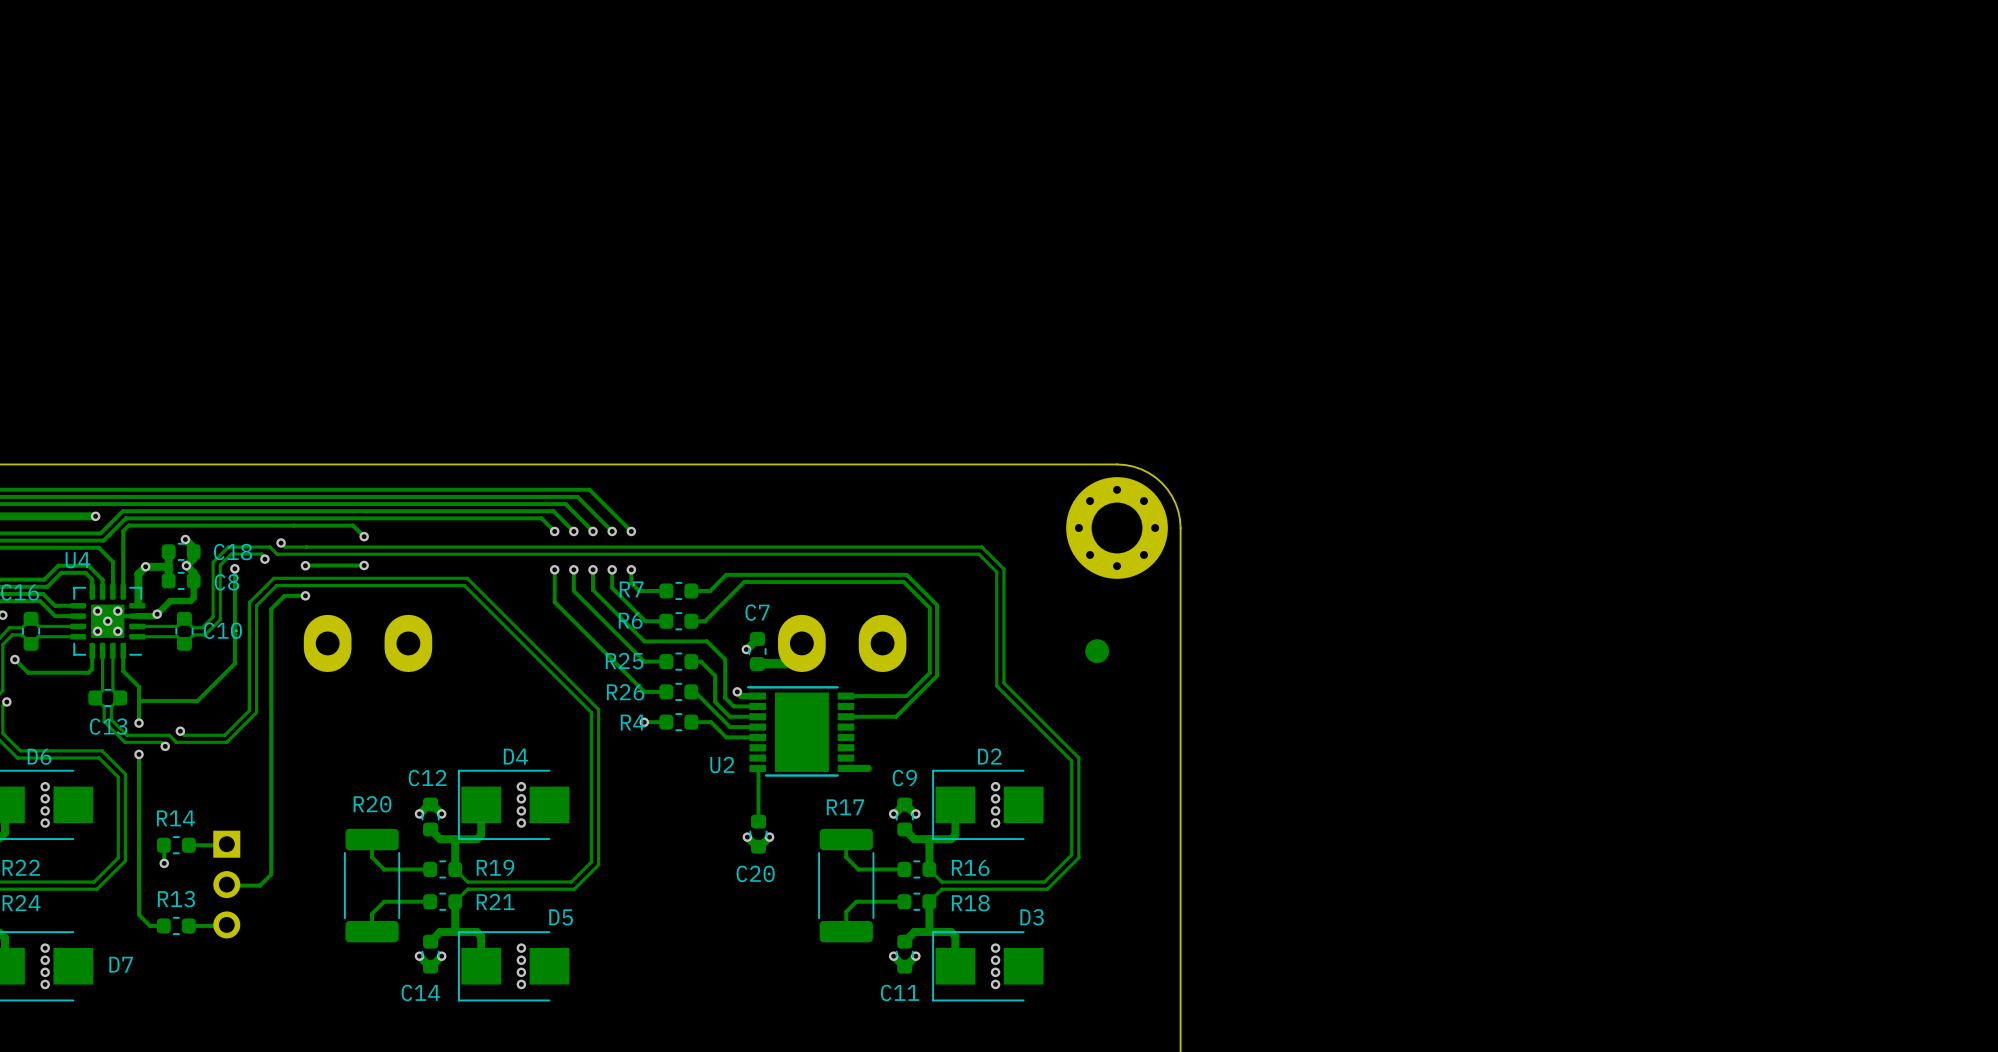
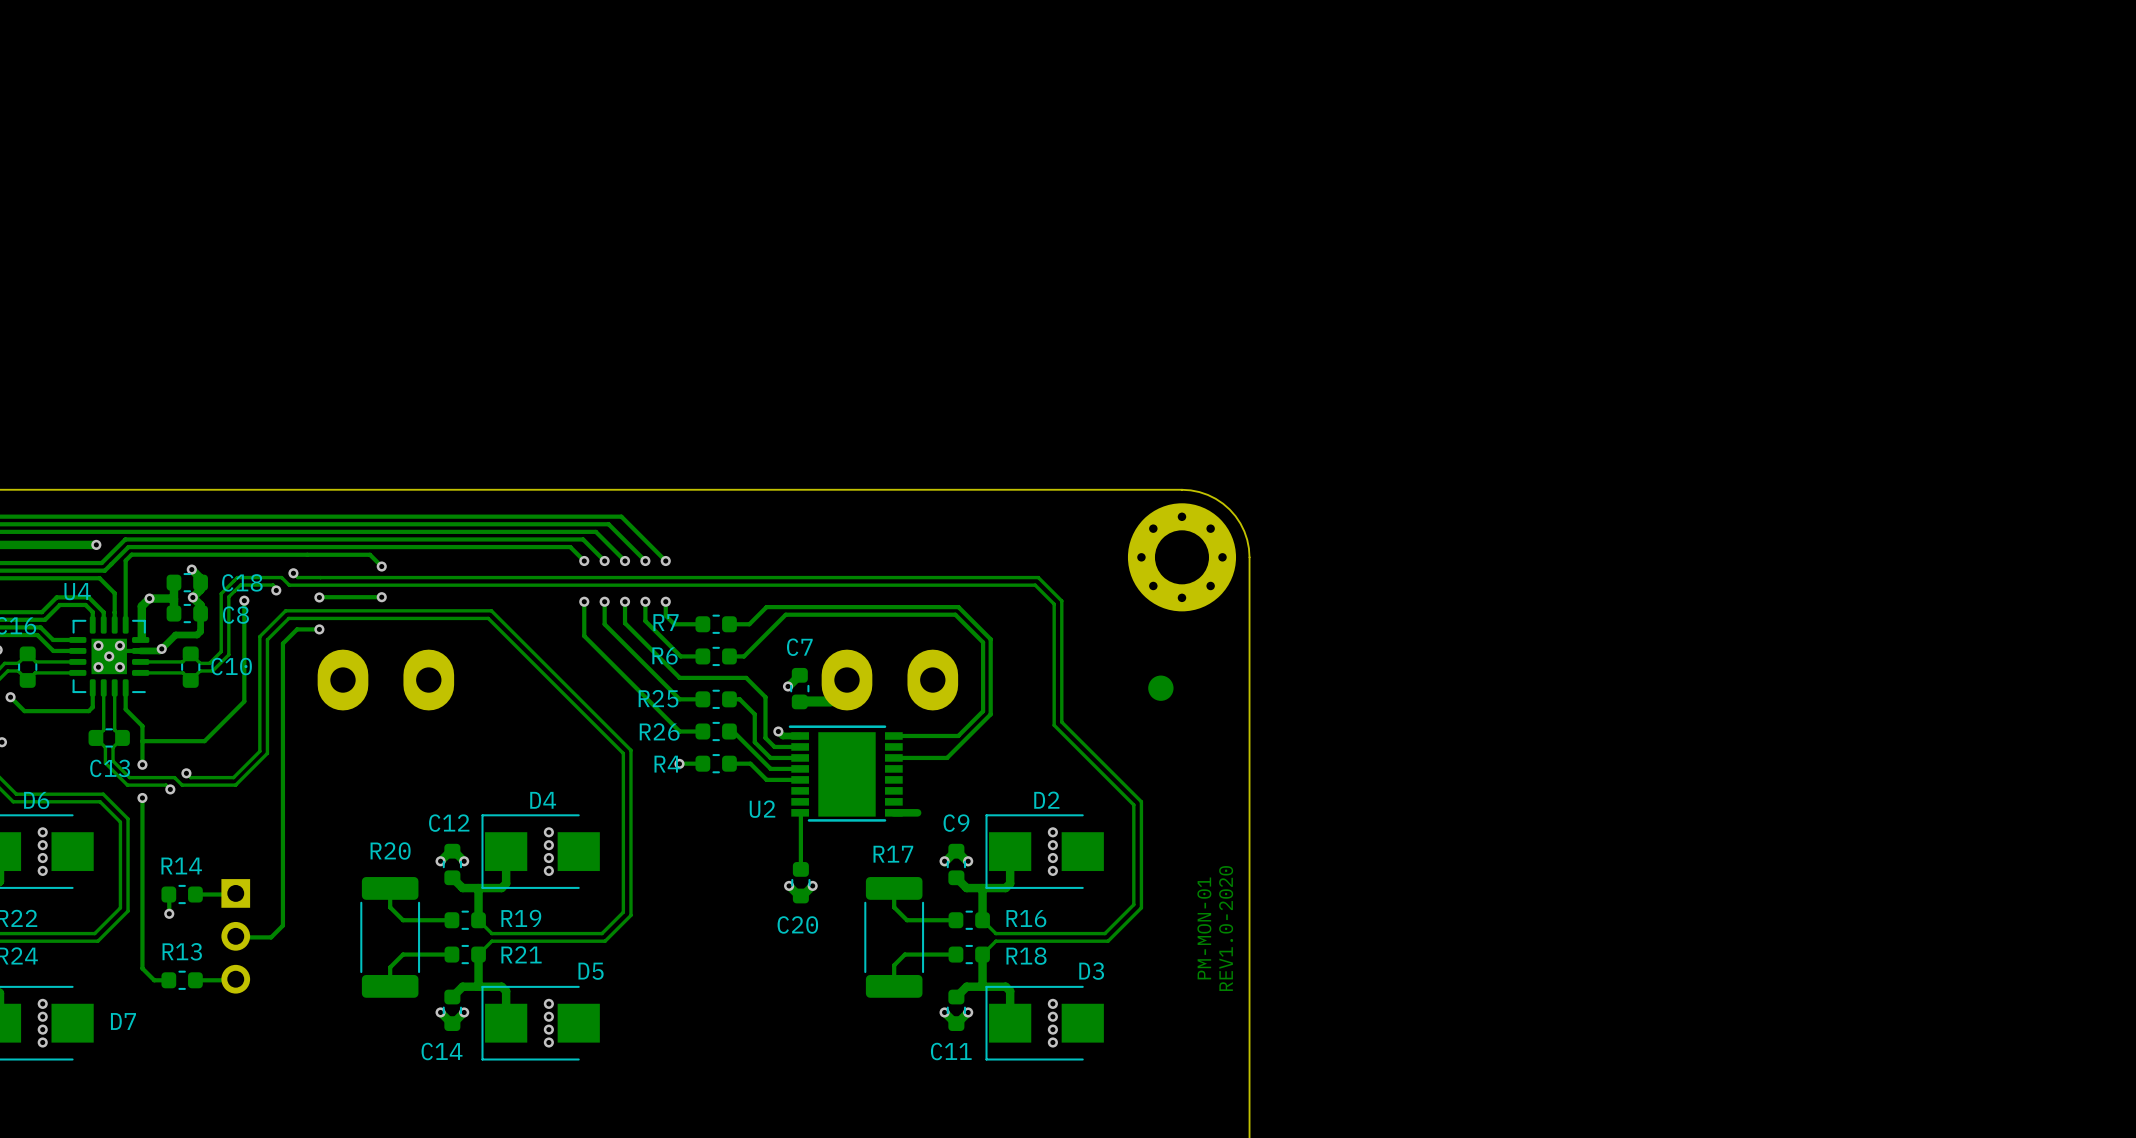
text: none -> PM-MON-01 (1204, 928)
text: none -> REV1.0-2020 (1226, 928)

